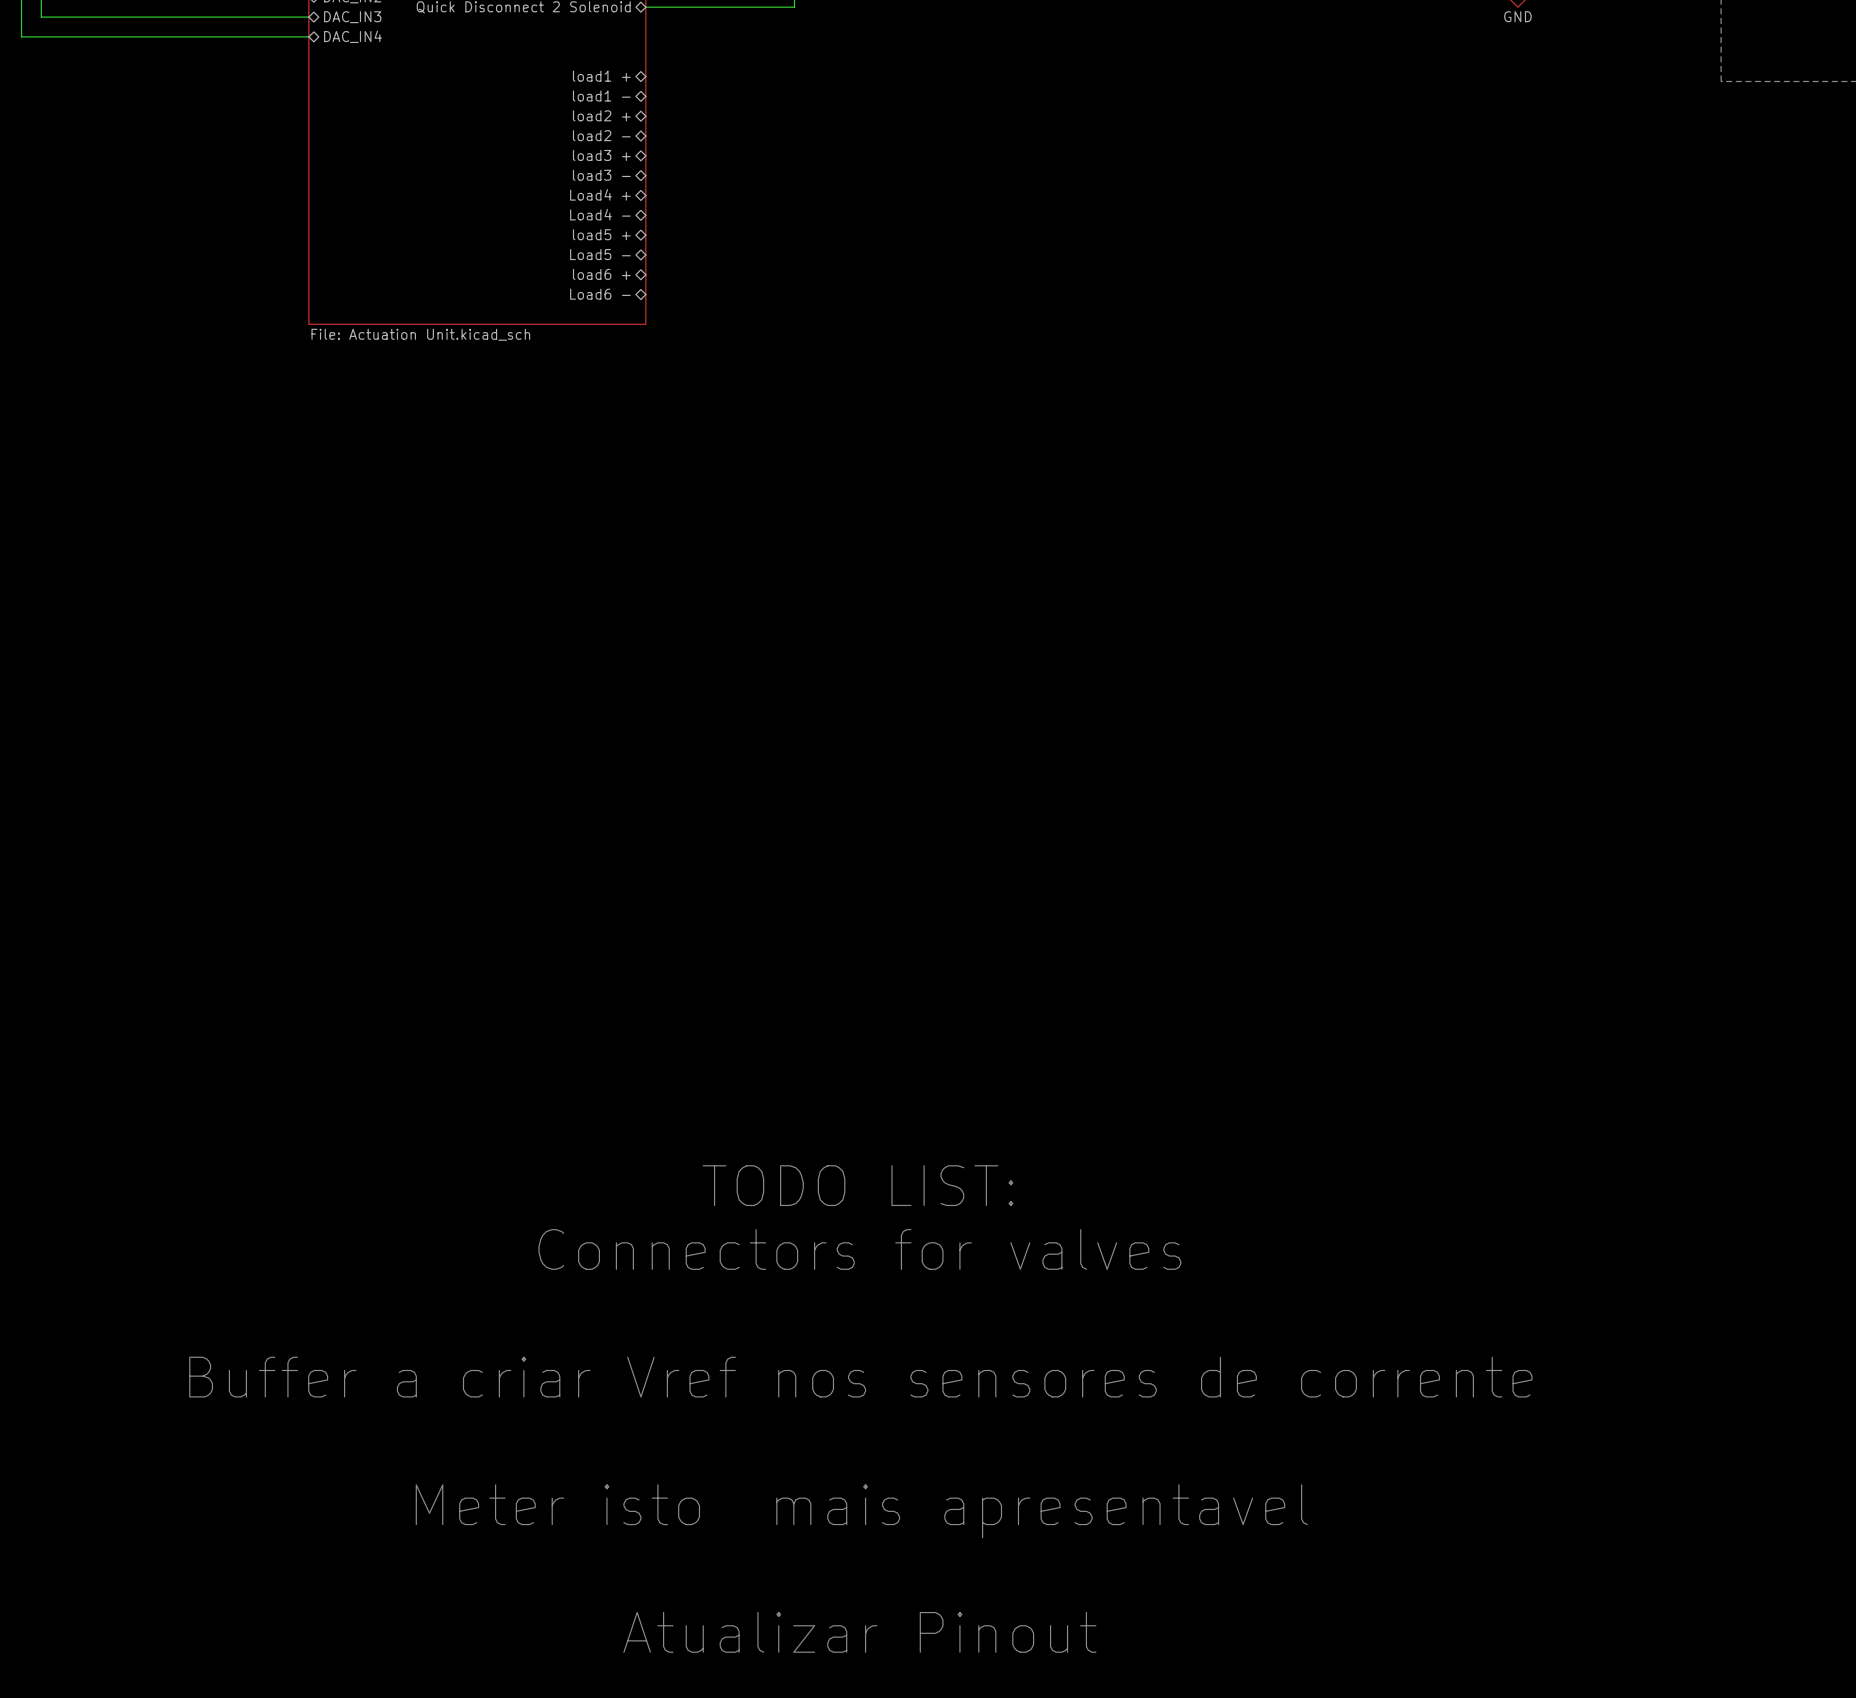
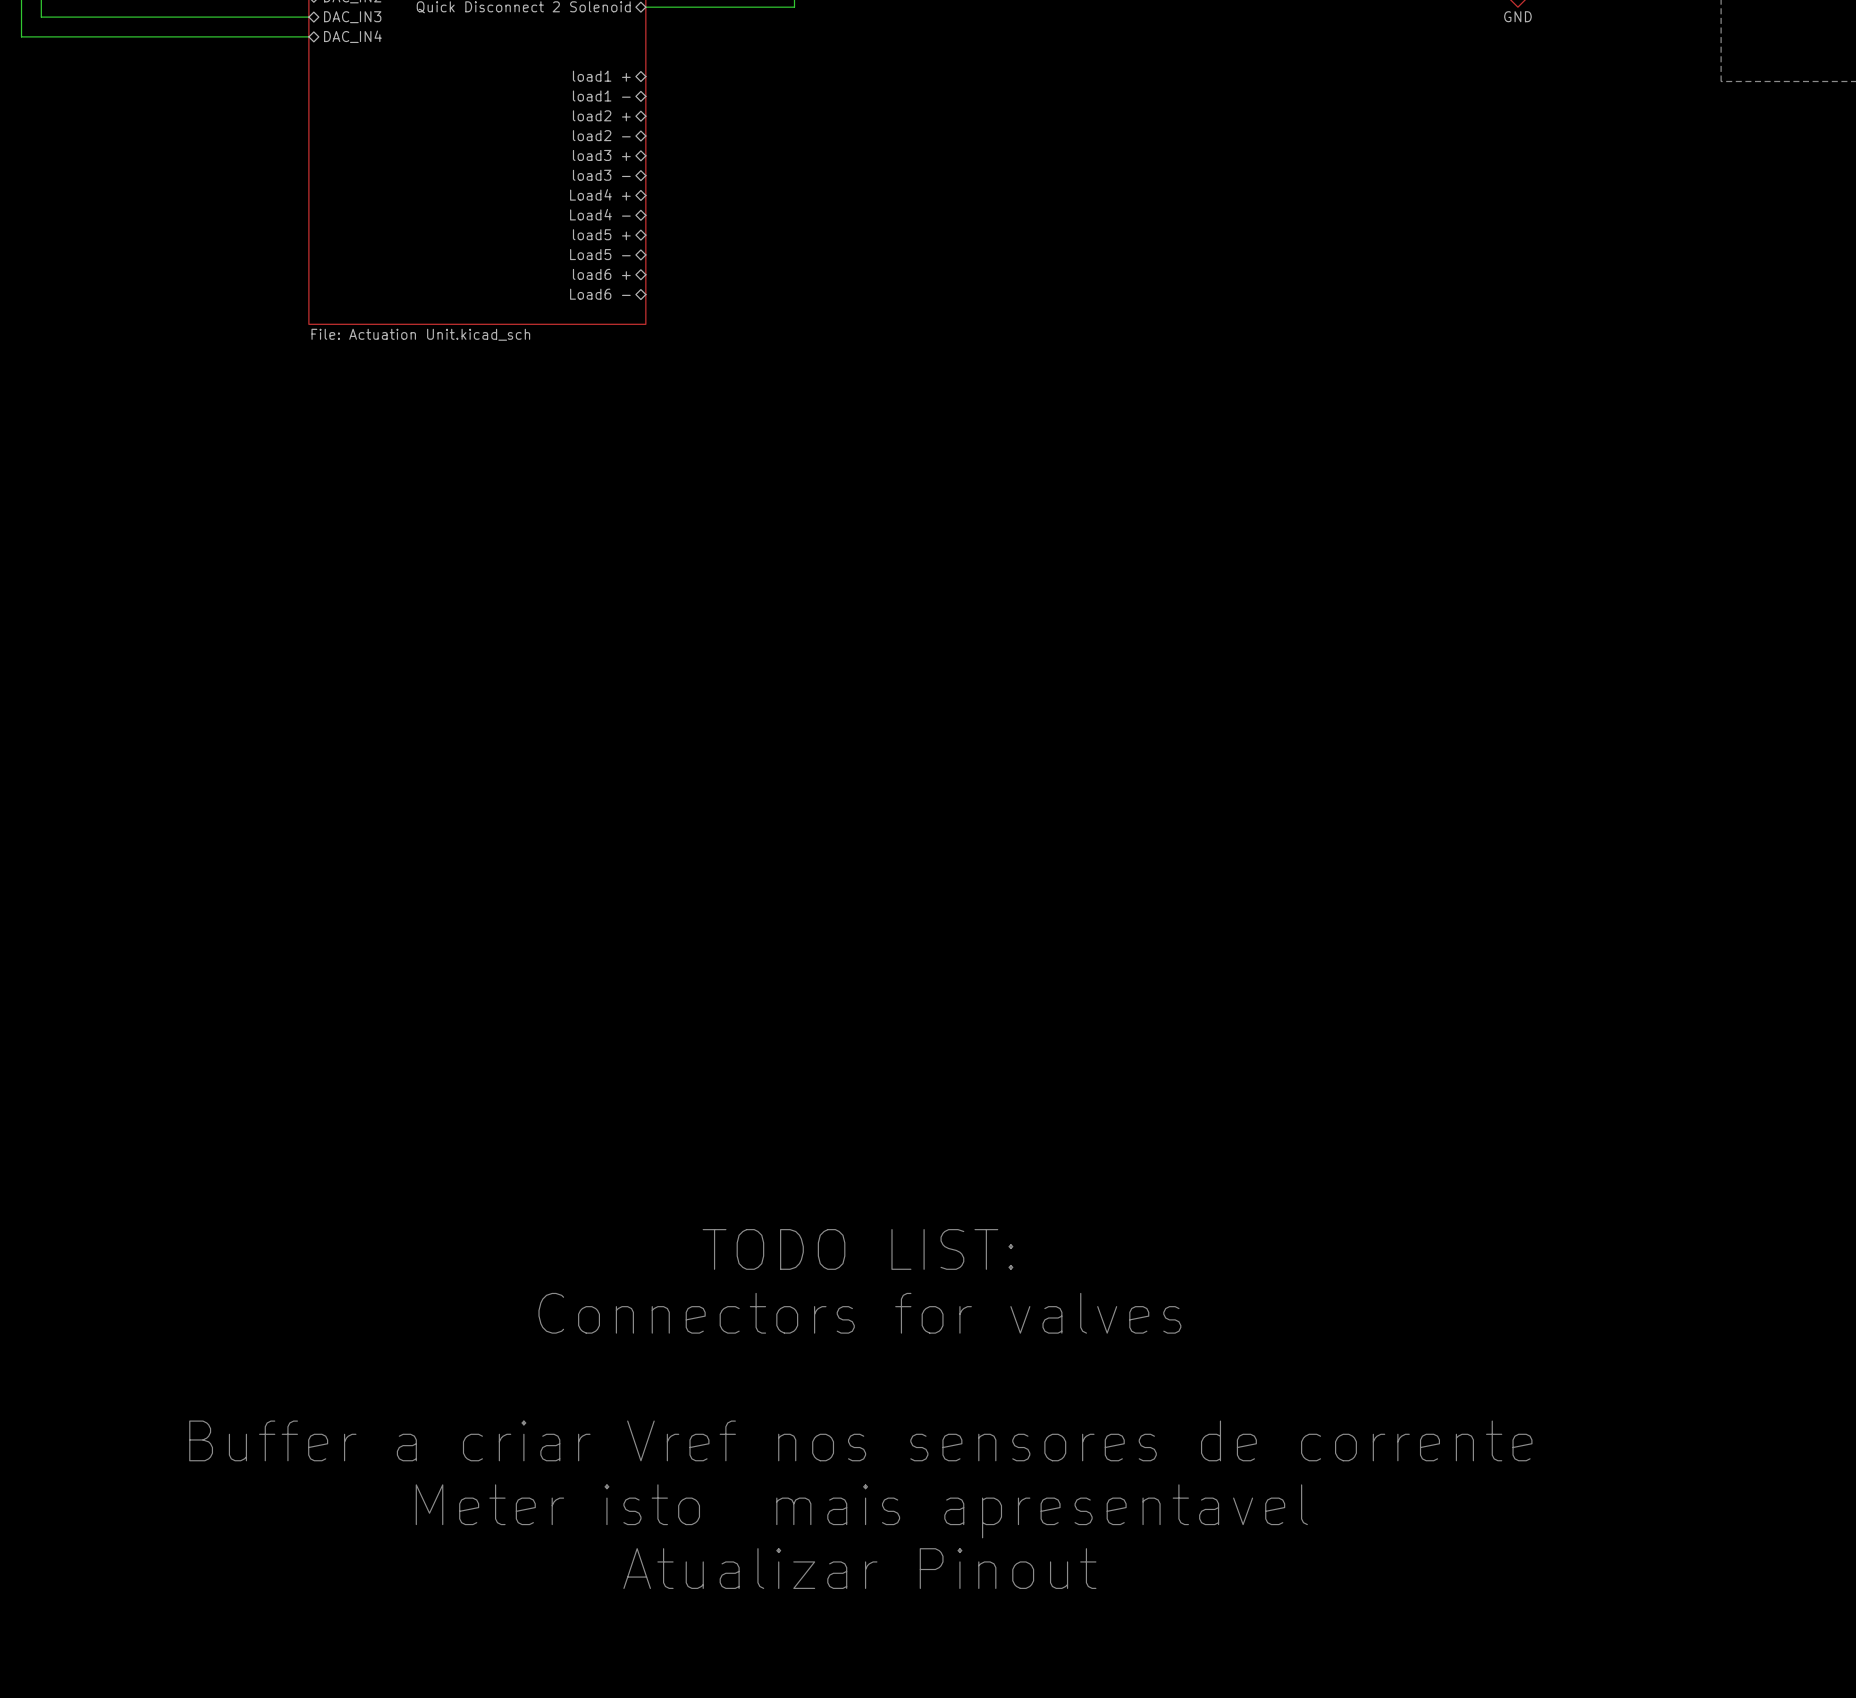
text: TODO LIST: (858, 1185) -> none
text: Connectors for valves (859, 1249) -> TODO LIST: (858, 1249)
text: none -> Connectors for valves (859, 1313)
text position: Buffer a criar Vref nos sensores de corrente (860, 1377) -> Buffer a criar Vref nos sensores de corrente (860, 1440)
text position: Atualizar Pinout (859, 1632) -> Atualizar Pinout (859, 1568)

